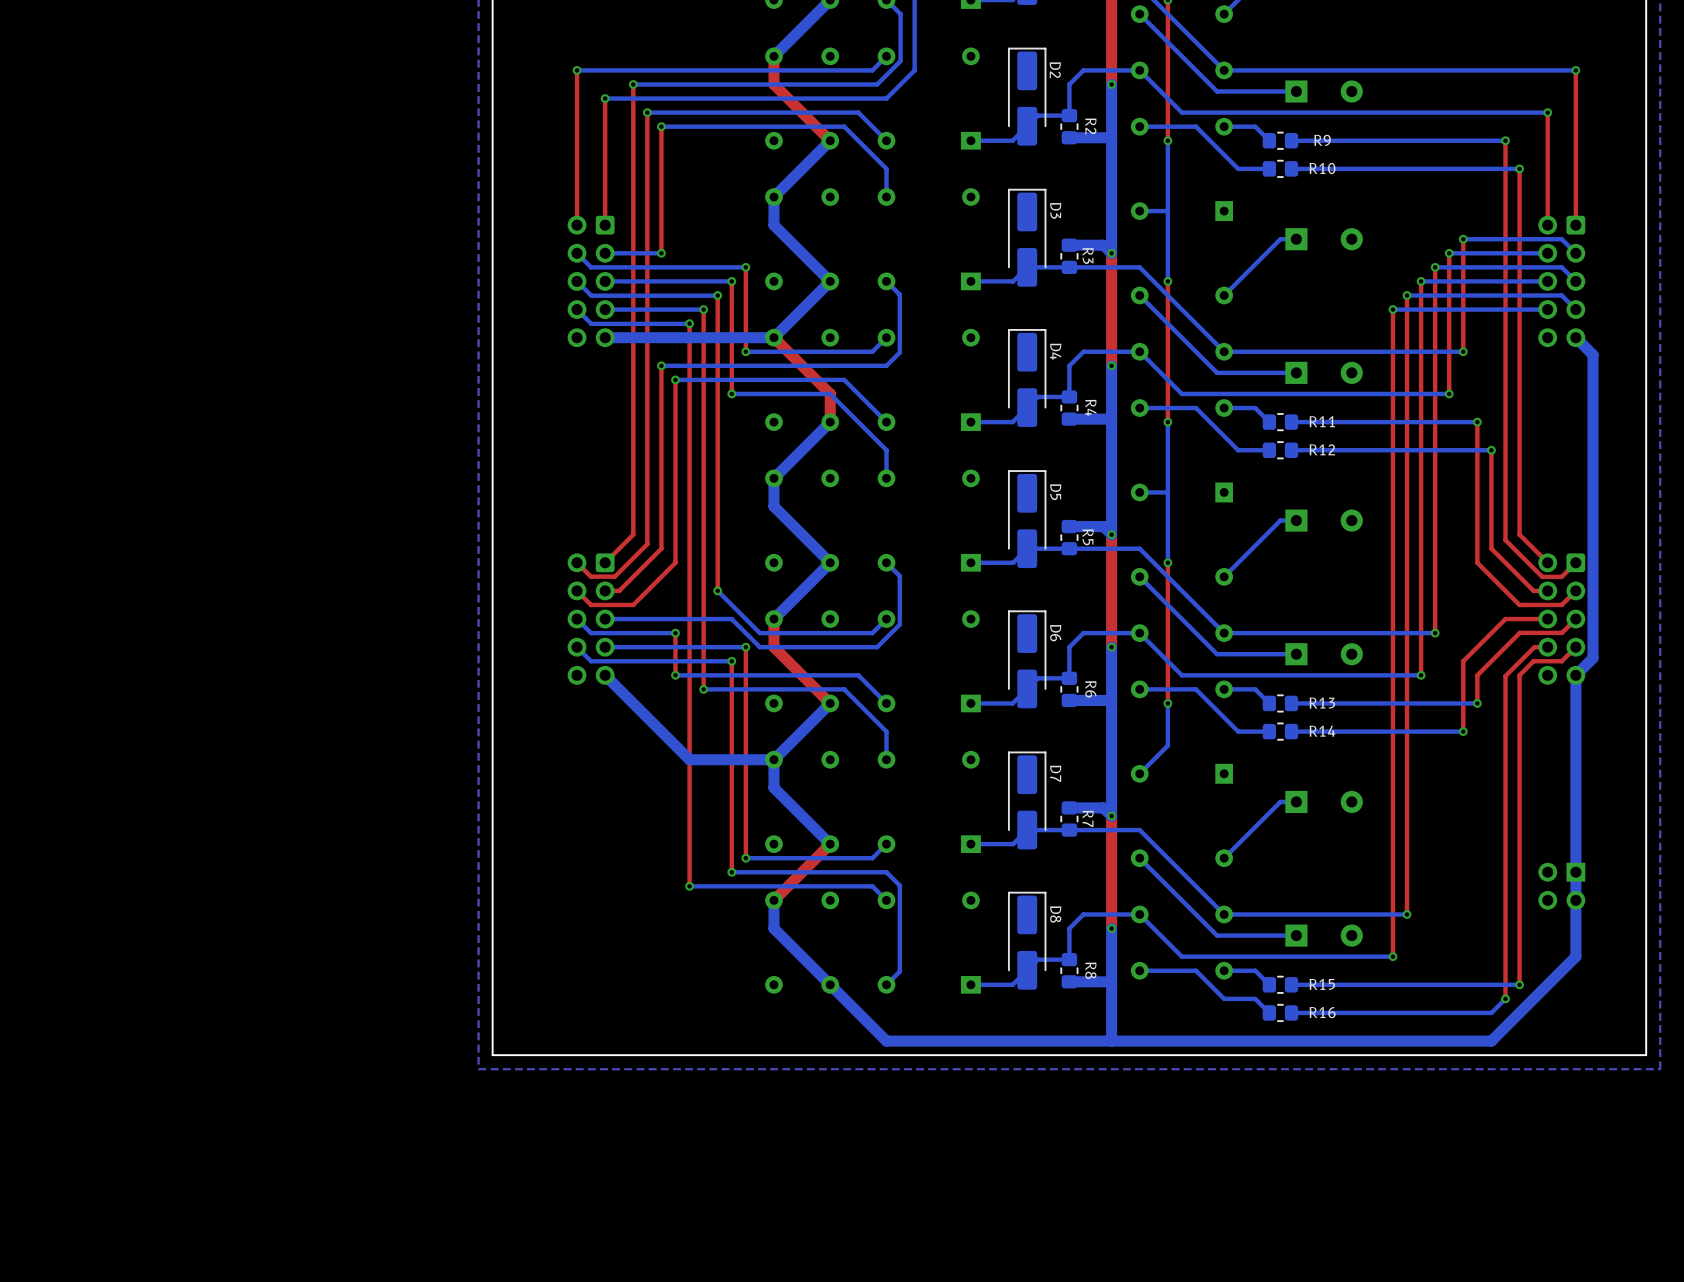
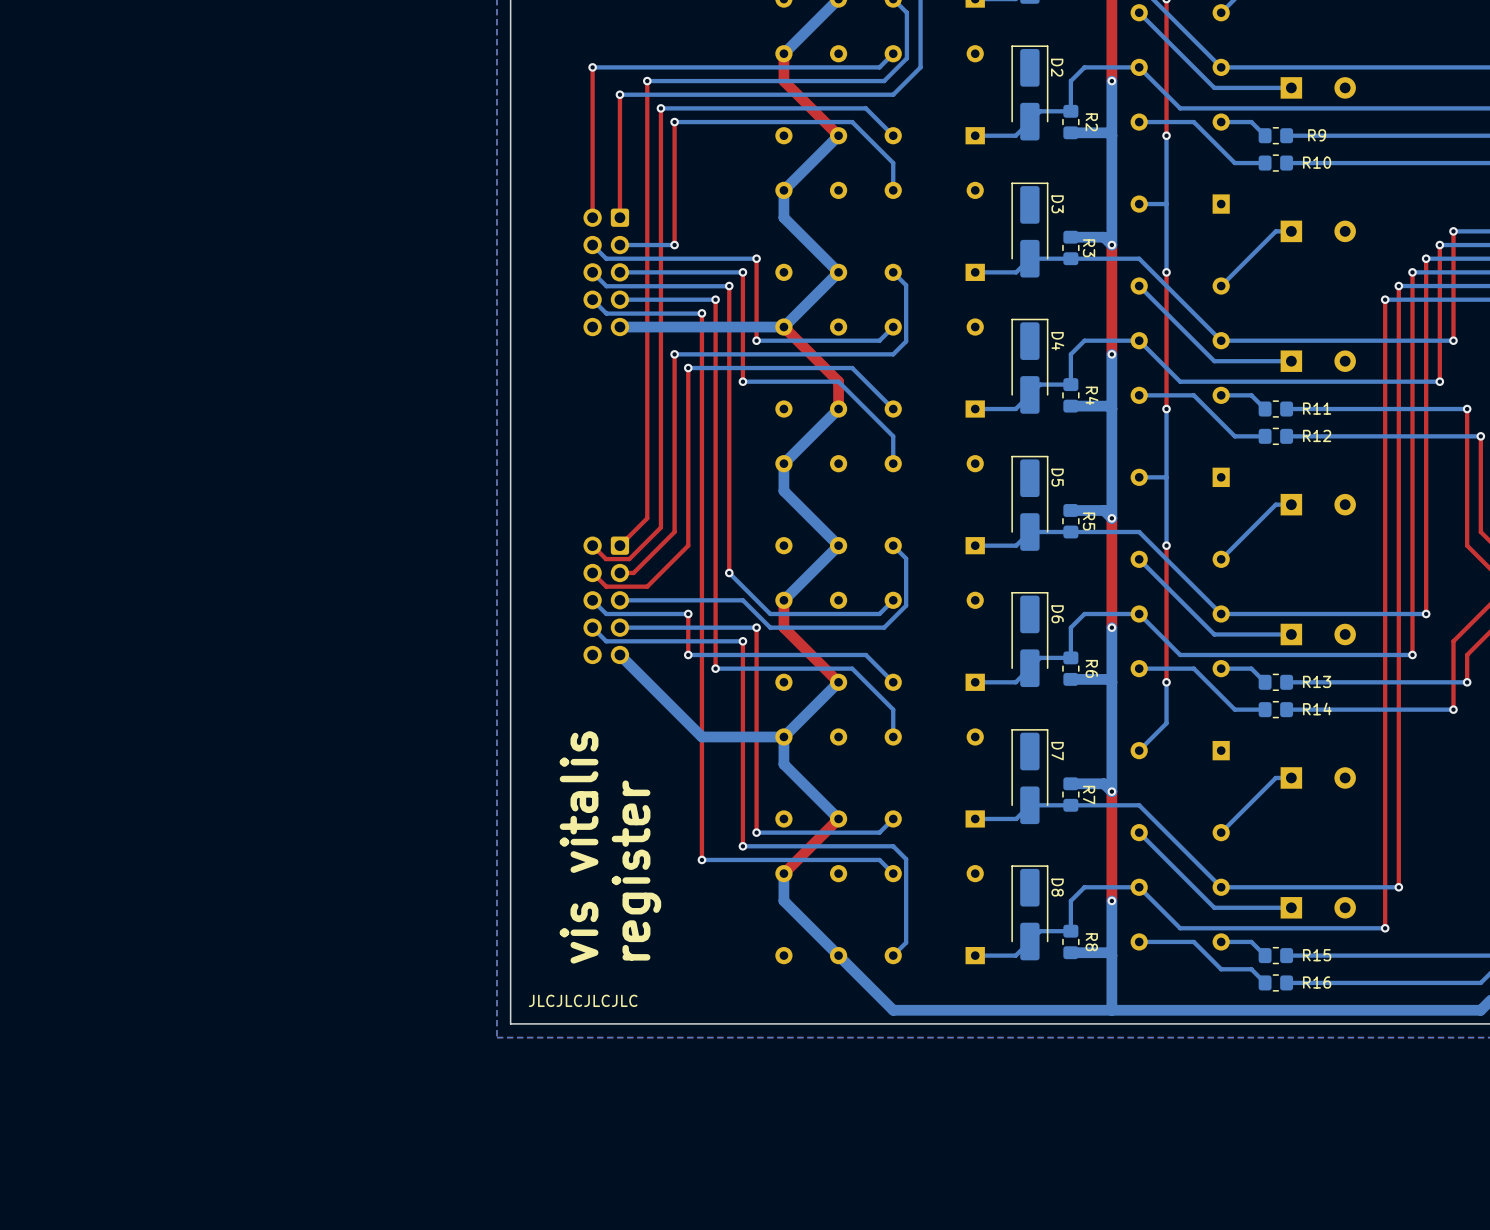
text: none -> vis vitalis (579, 847)
text: none -> register (636, 870)
text: none -> JLCJLCJLCJLC (583, 1000)

